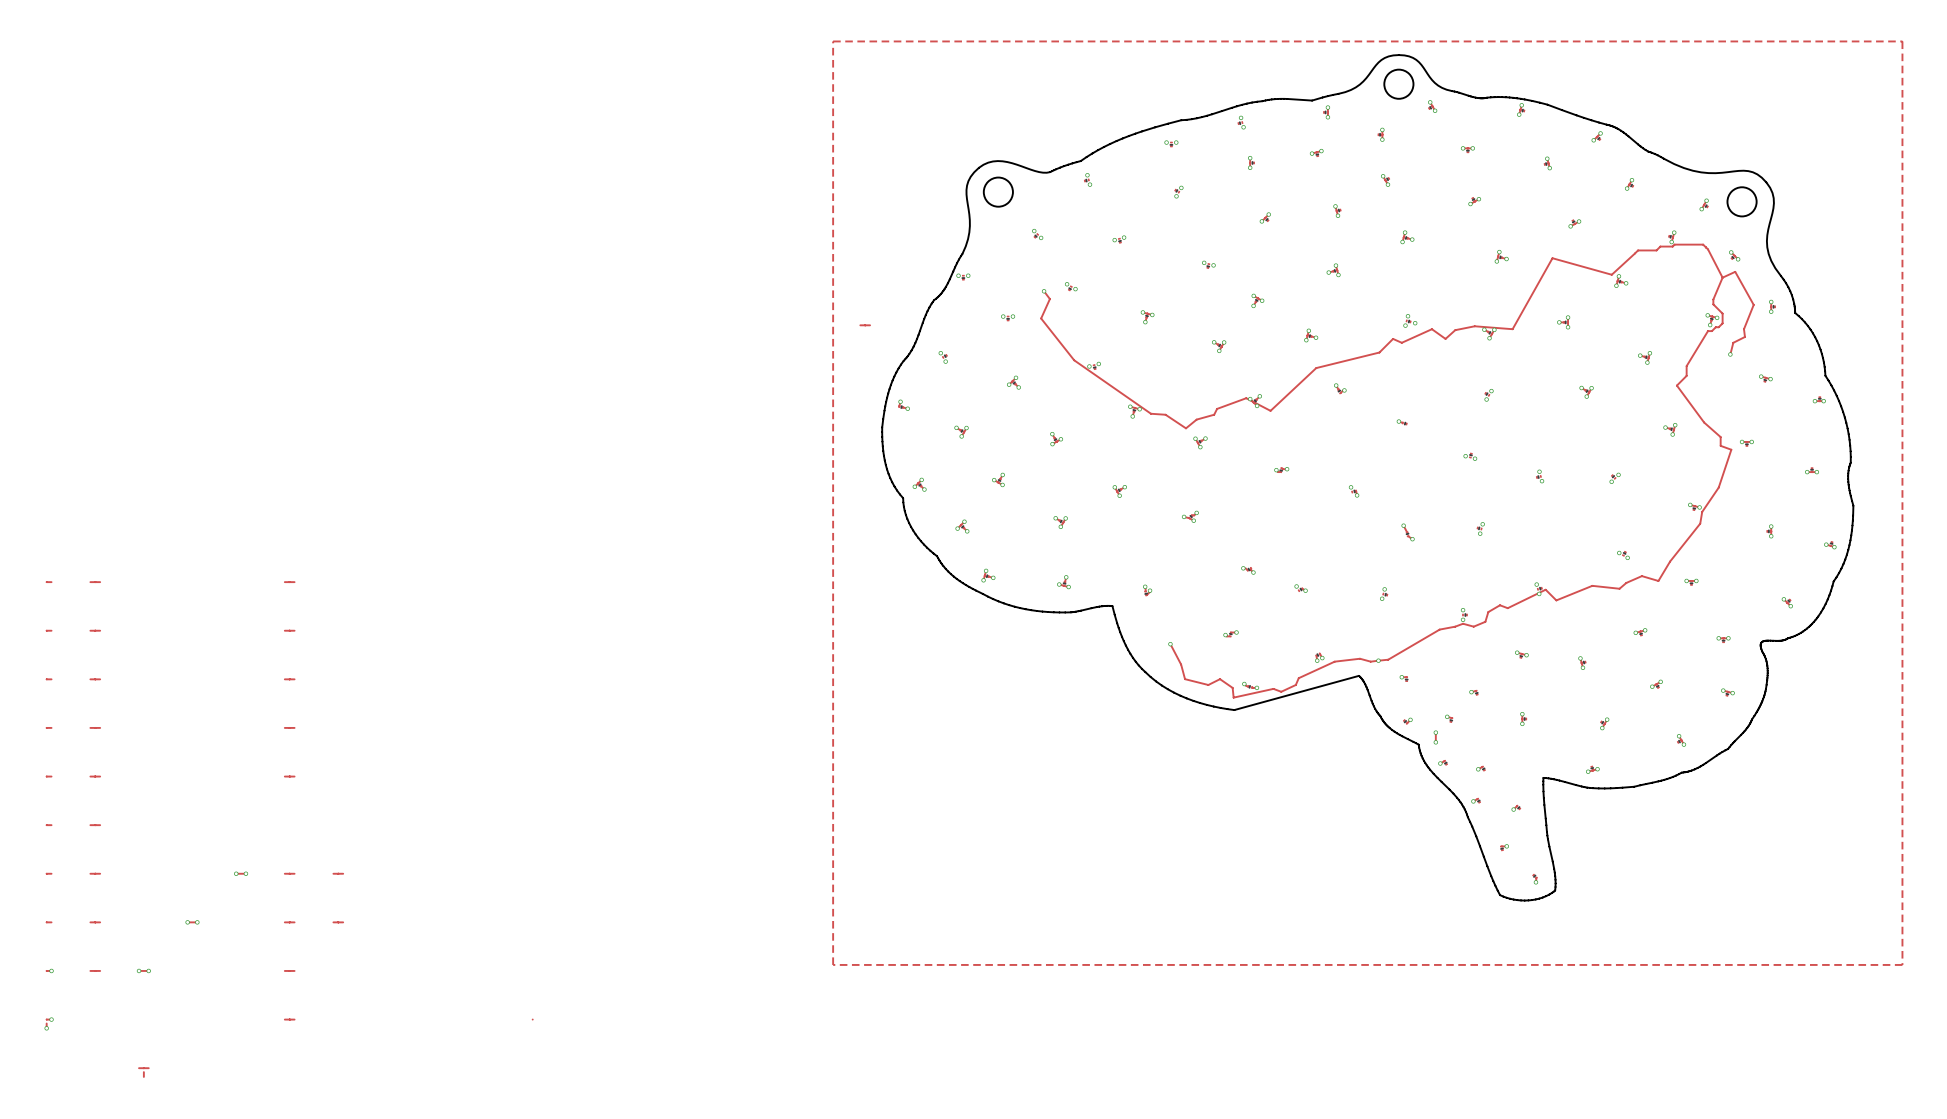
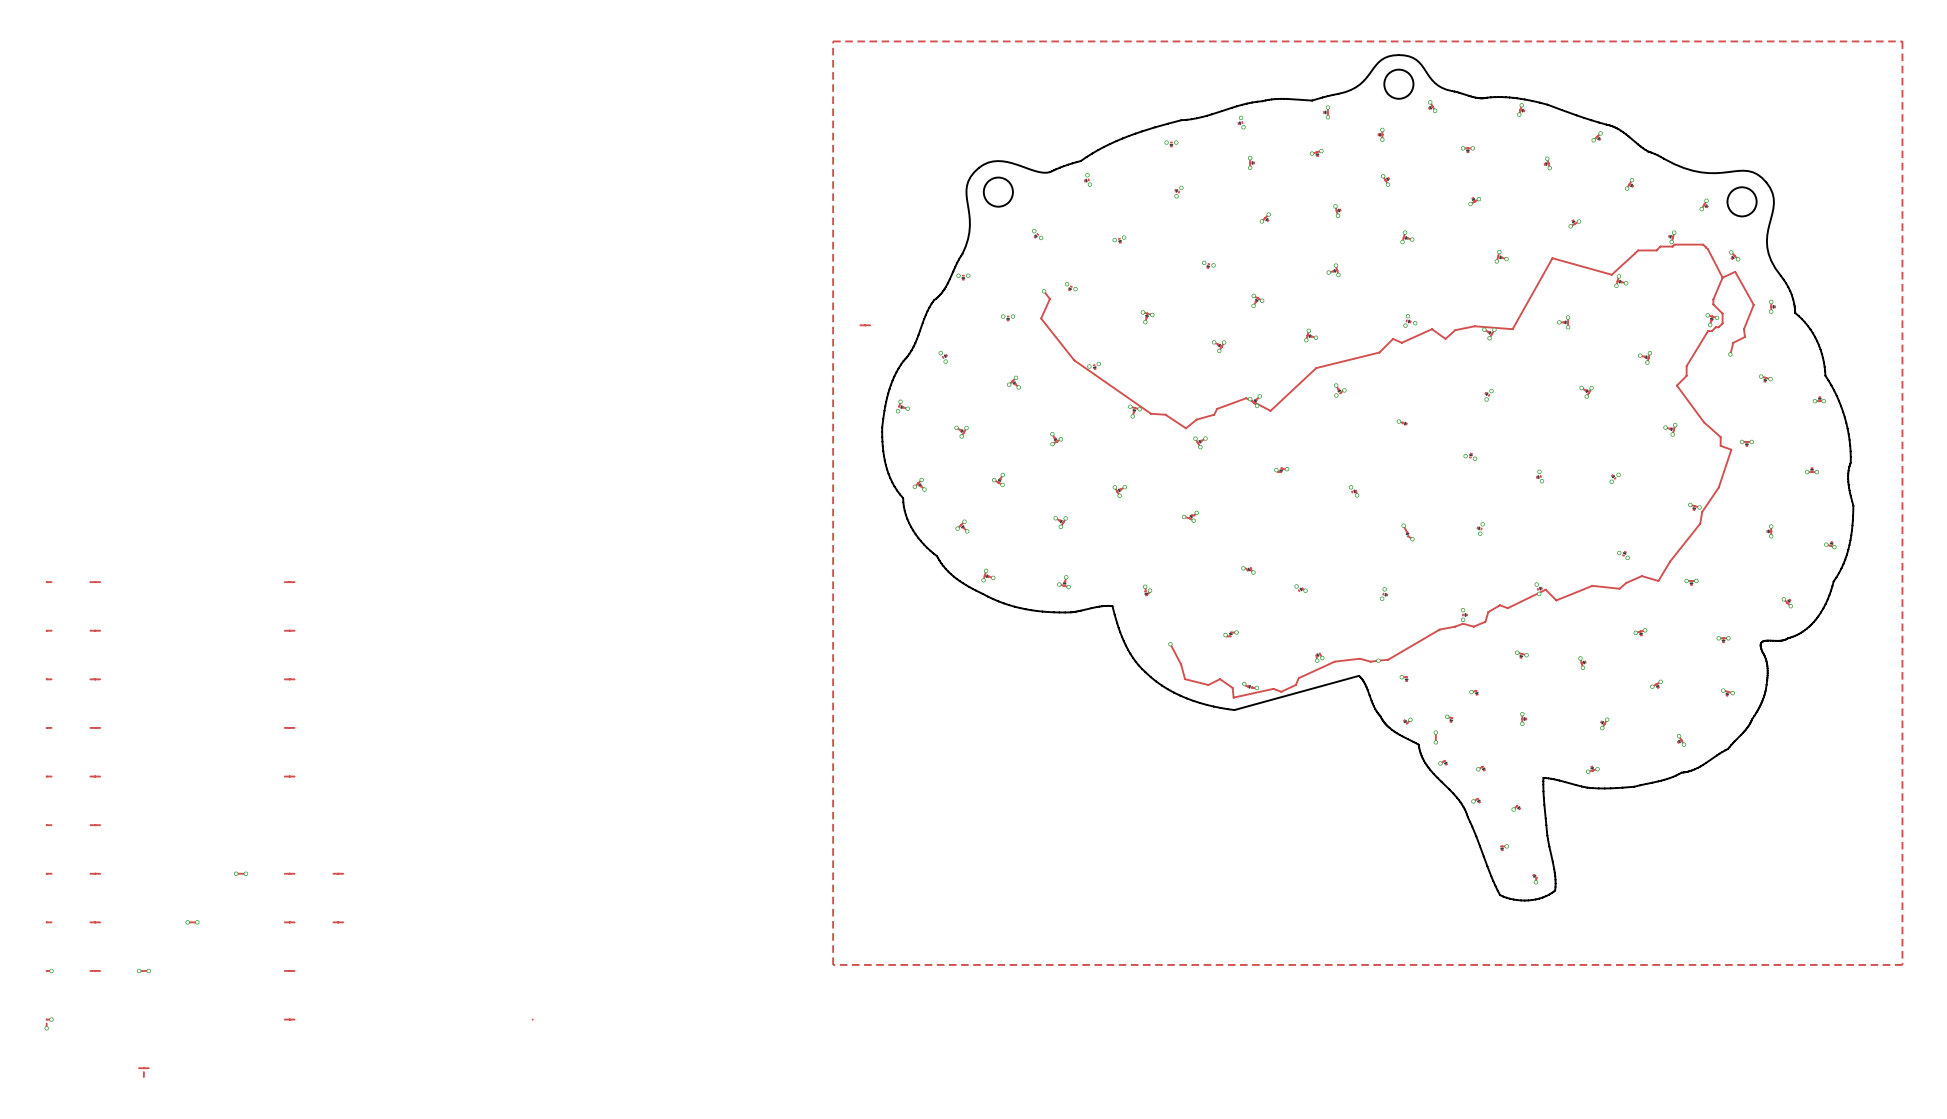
via: none -> (1336, 395)
via: none -> (898, 411)

